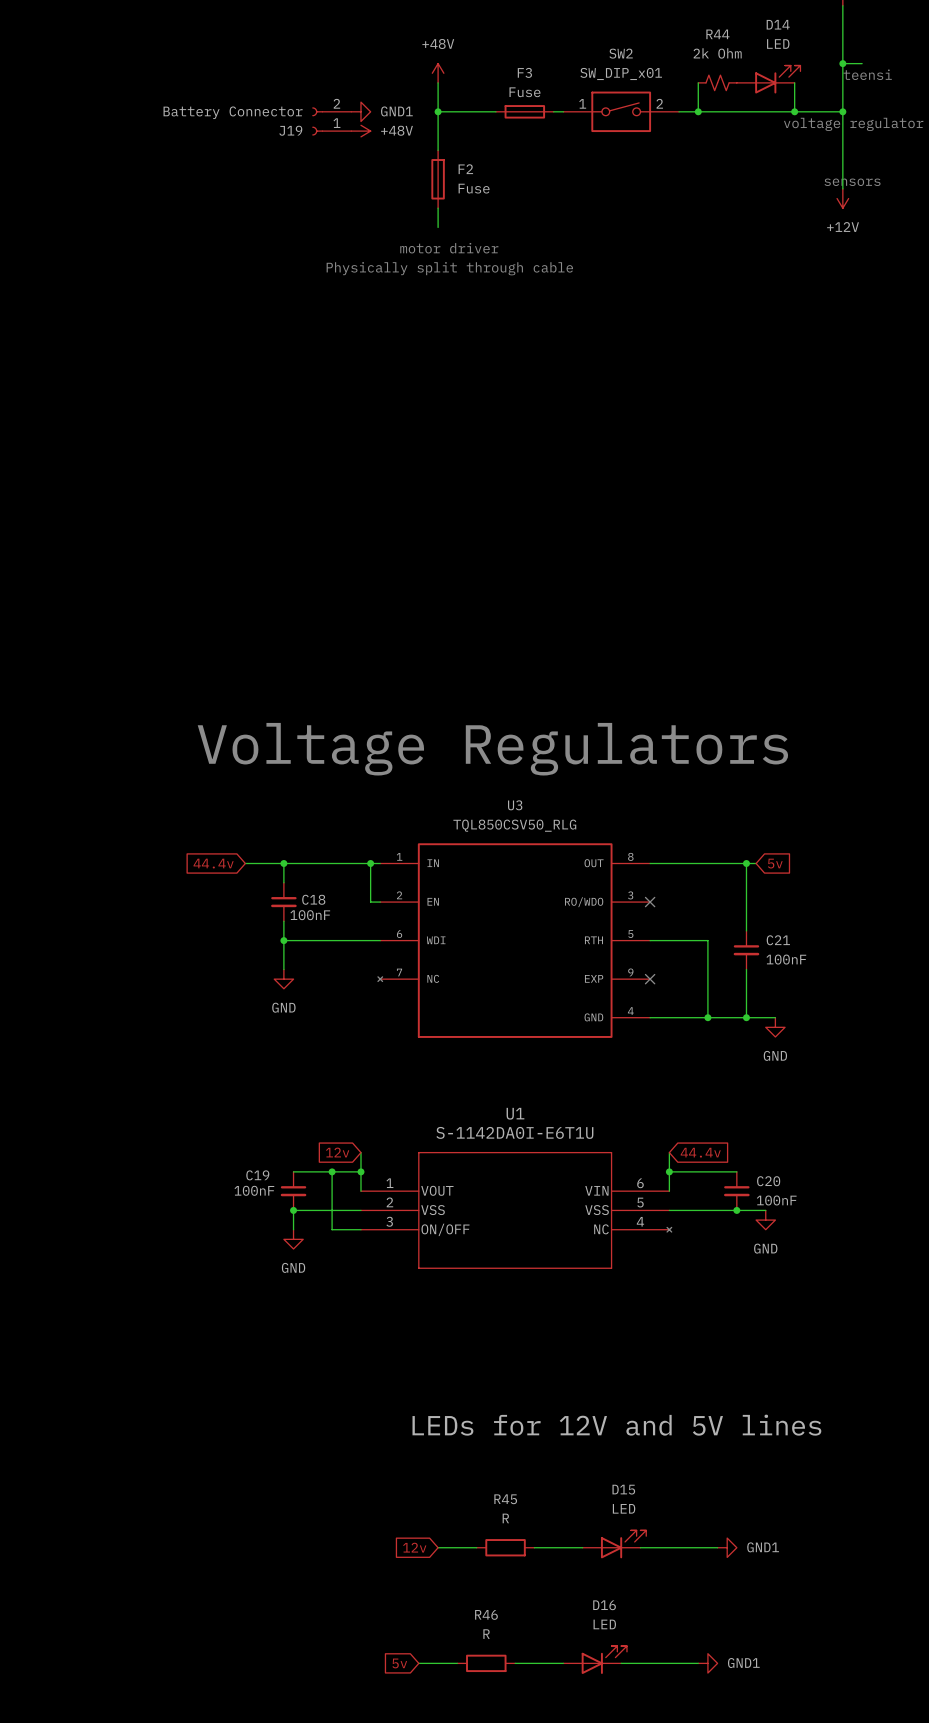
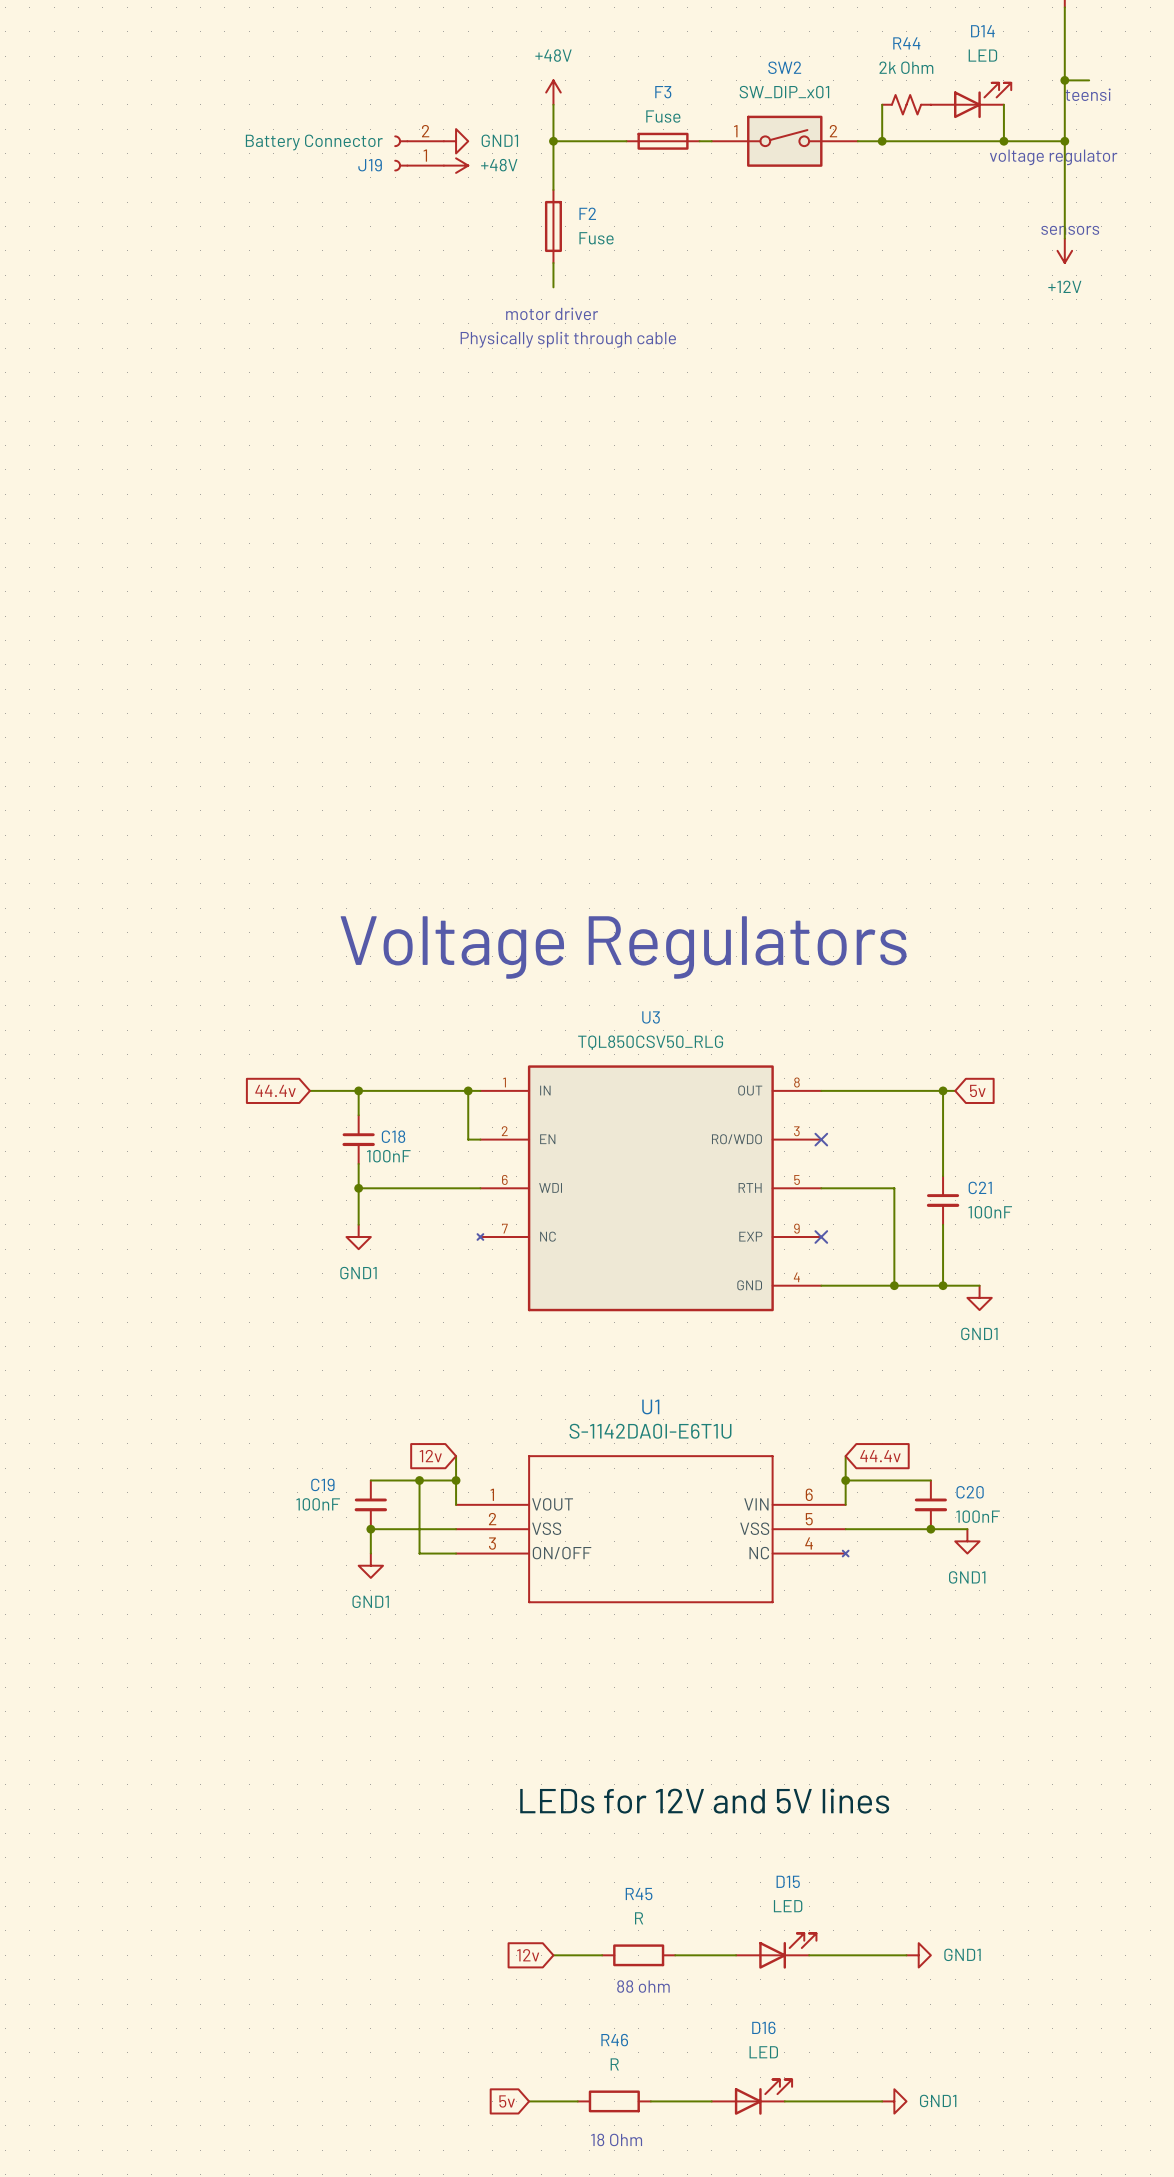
power symbol: GND (283, 979) -> GND1 (358, 1237)
power symbol: GND (775, 1027) -> GND1 (979, 1297)
power symbol: GND (765, 1220) -> GND1 (967, 1541)
power symbol: GND (293, 1239) -> GND1 (370, 1565)
text: none -> 88 ohm (643, 1986)
text: none -> 18 Ohm (616, 2139)

